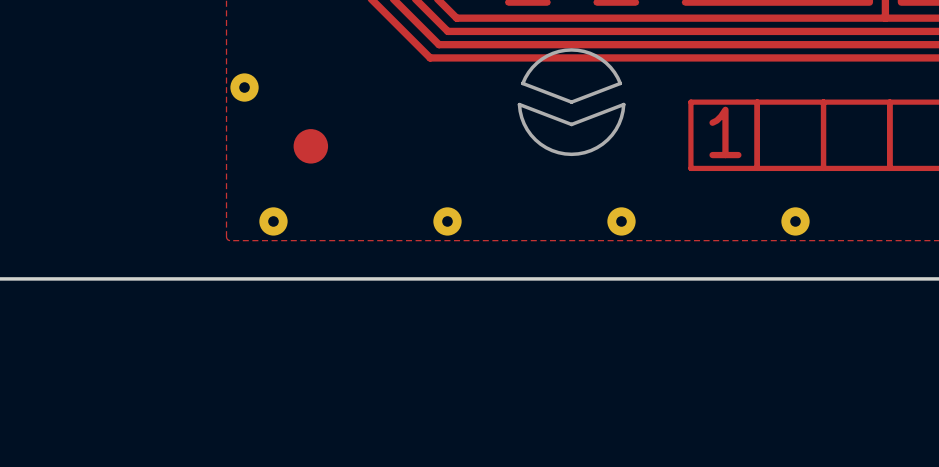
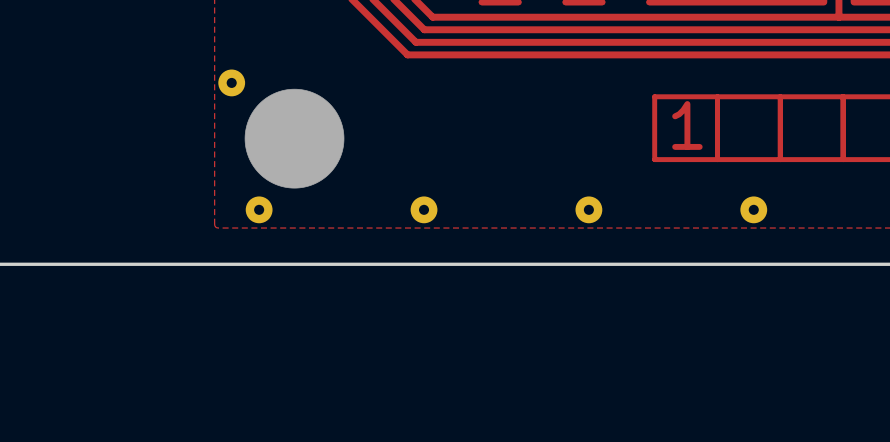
part: (571, 102) -> none
part footprint: [293, 129, 329, 164] -> [244, 88, 345, 189]

